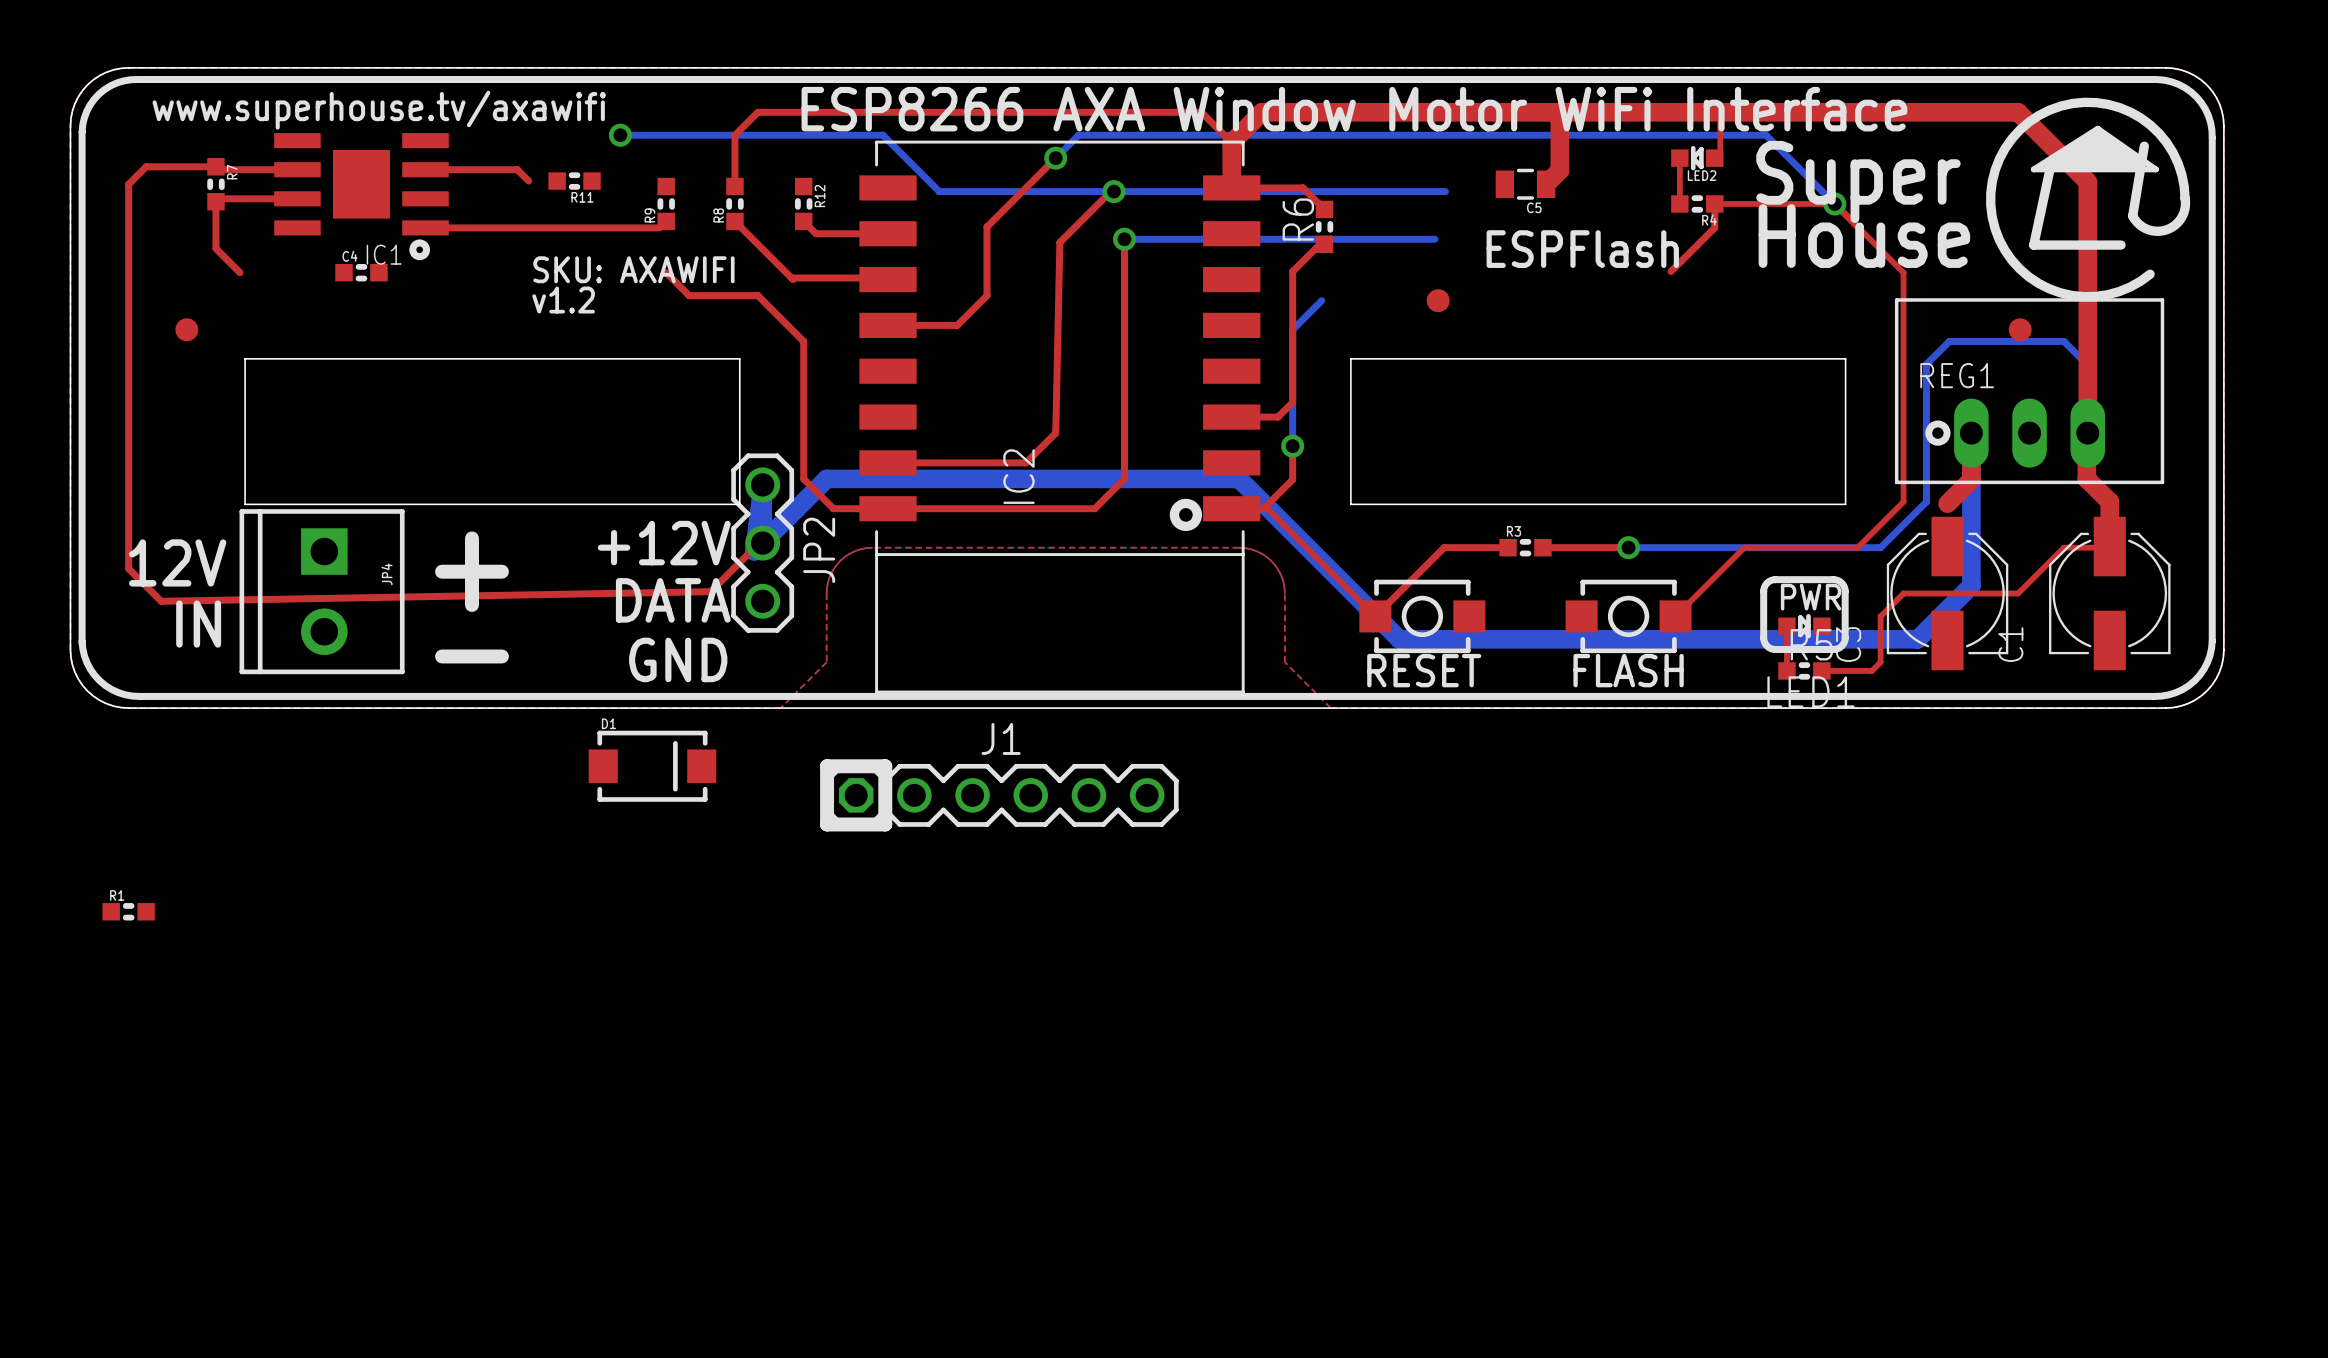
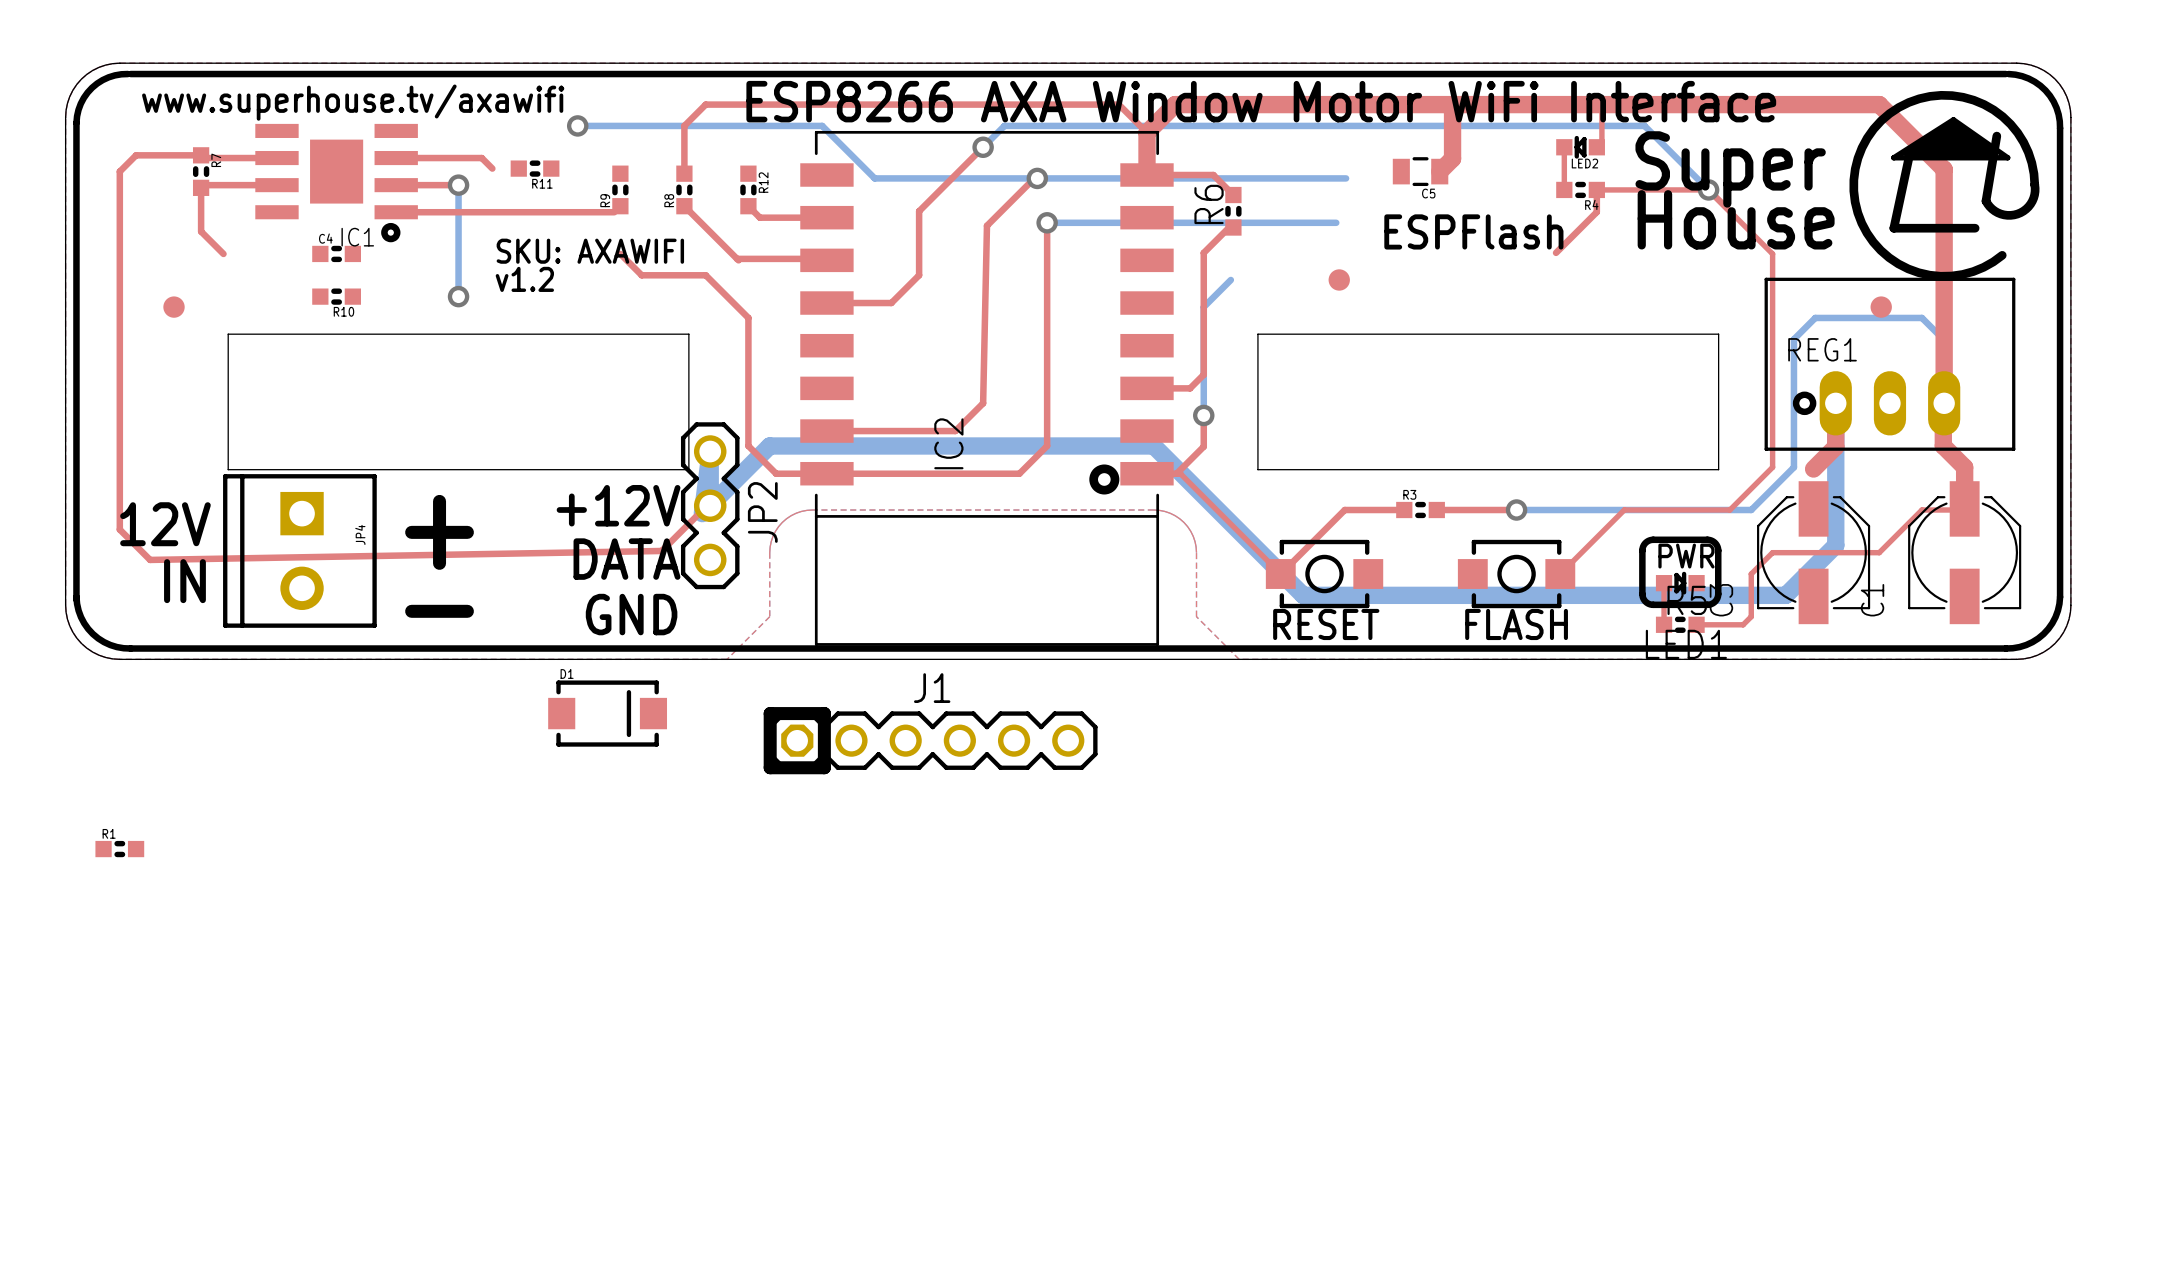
top track: none -> (396, 185) (458, 185)
bottom track: none -> (458, 185) (458, 296)
via: none -> (458, 185)
R10: none -> (336, 296)
via: none -> (458, 296)

